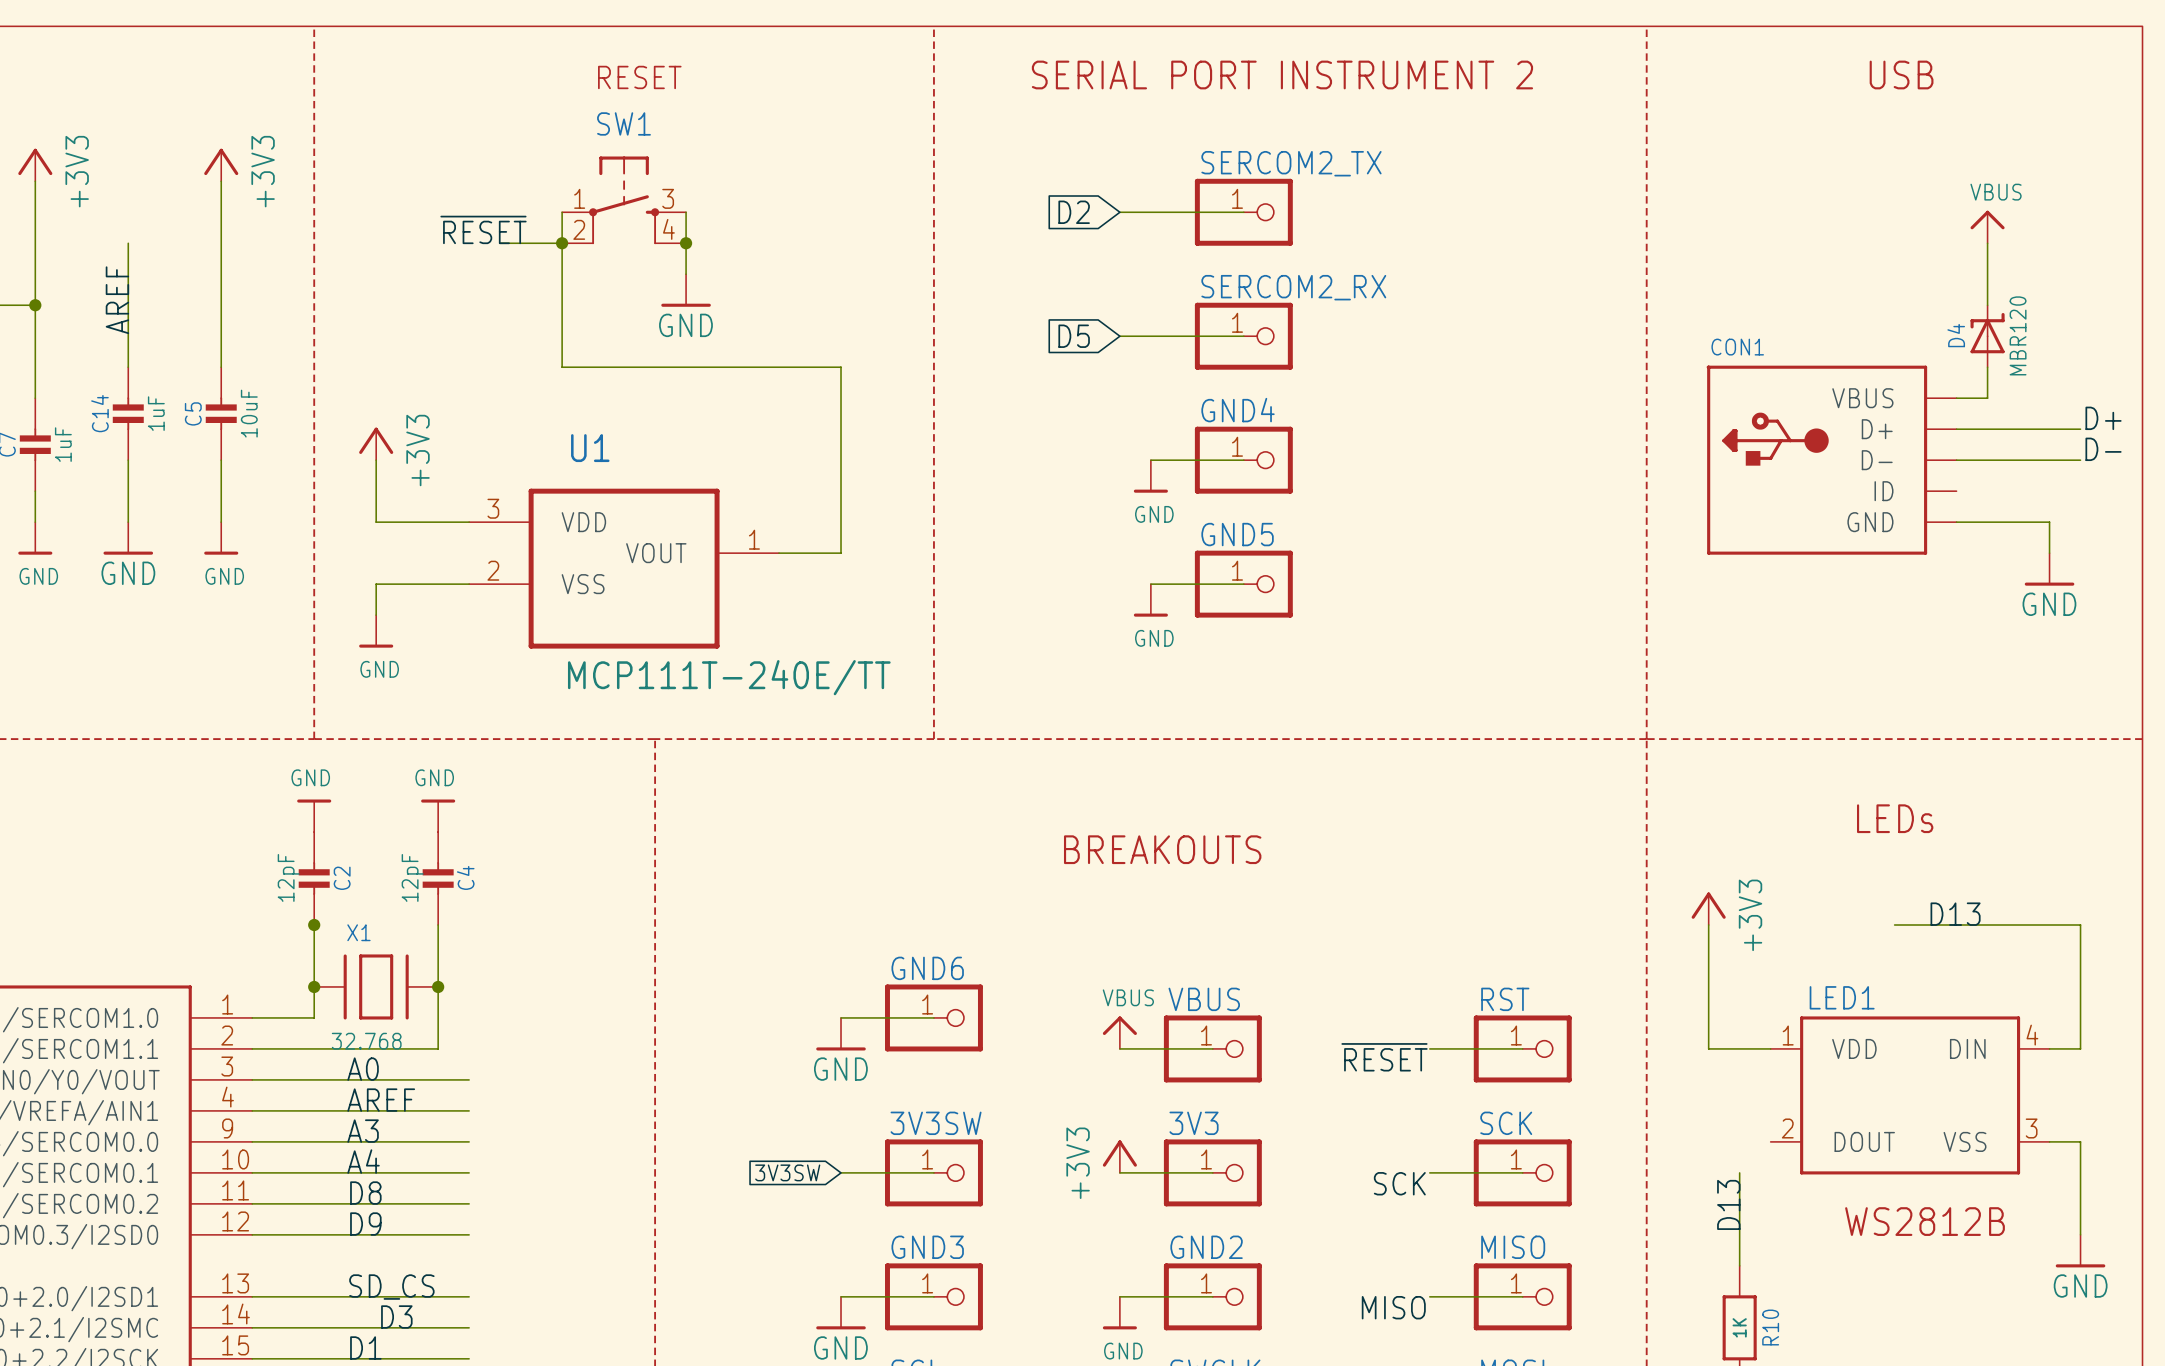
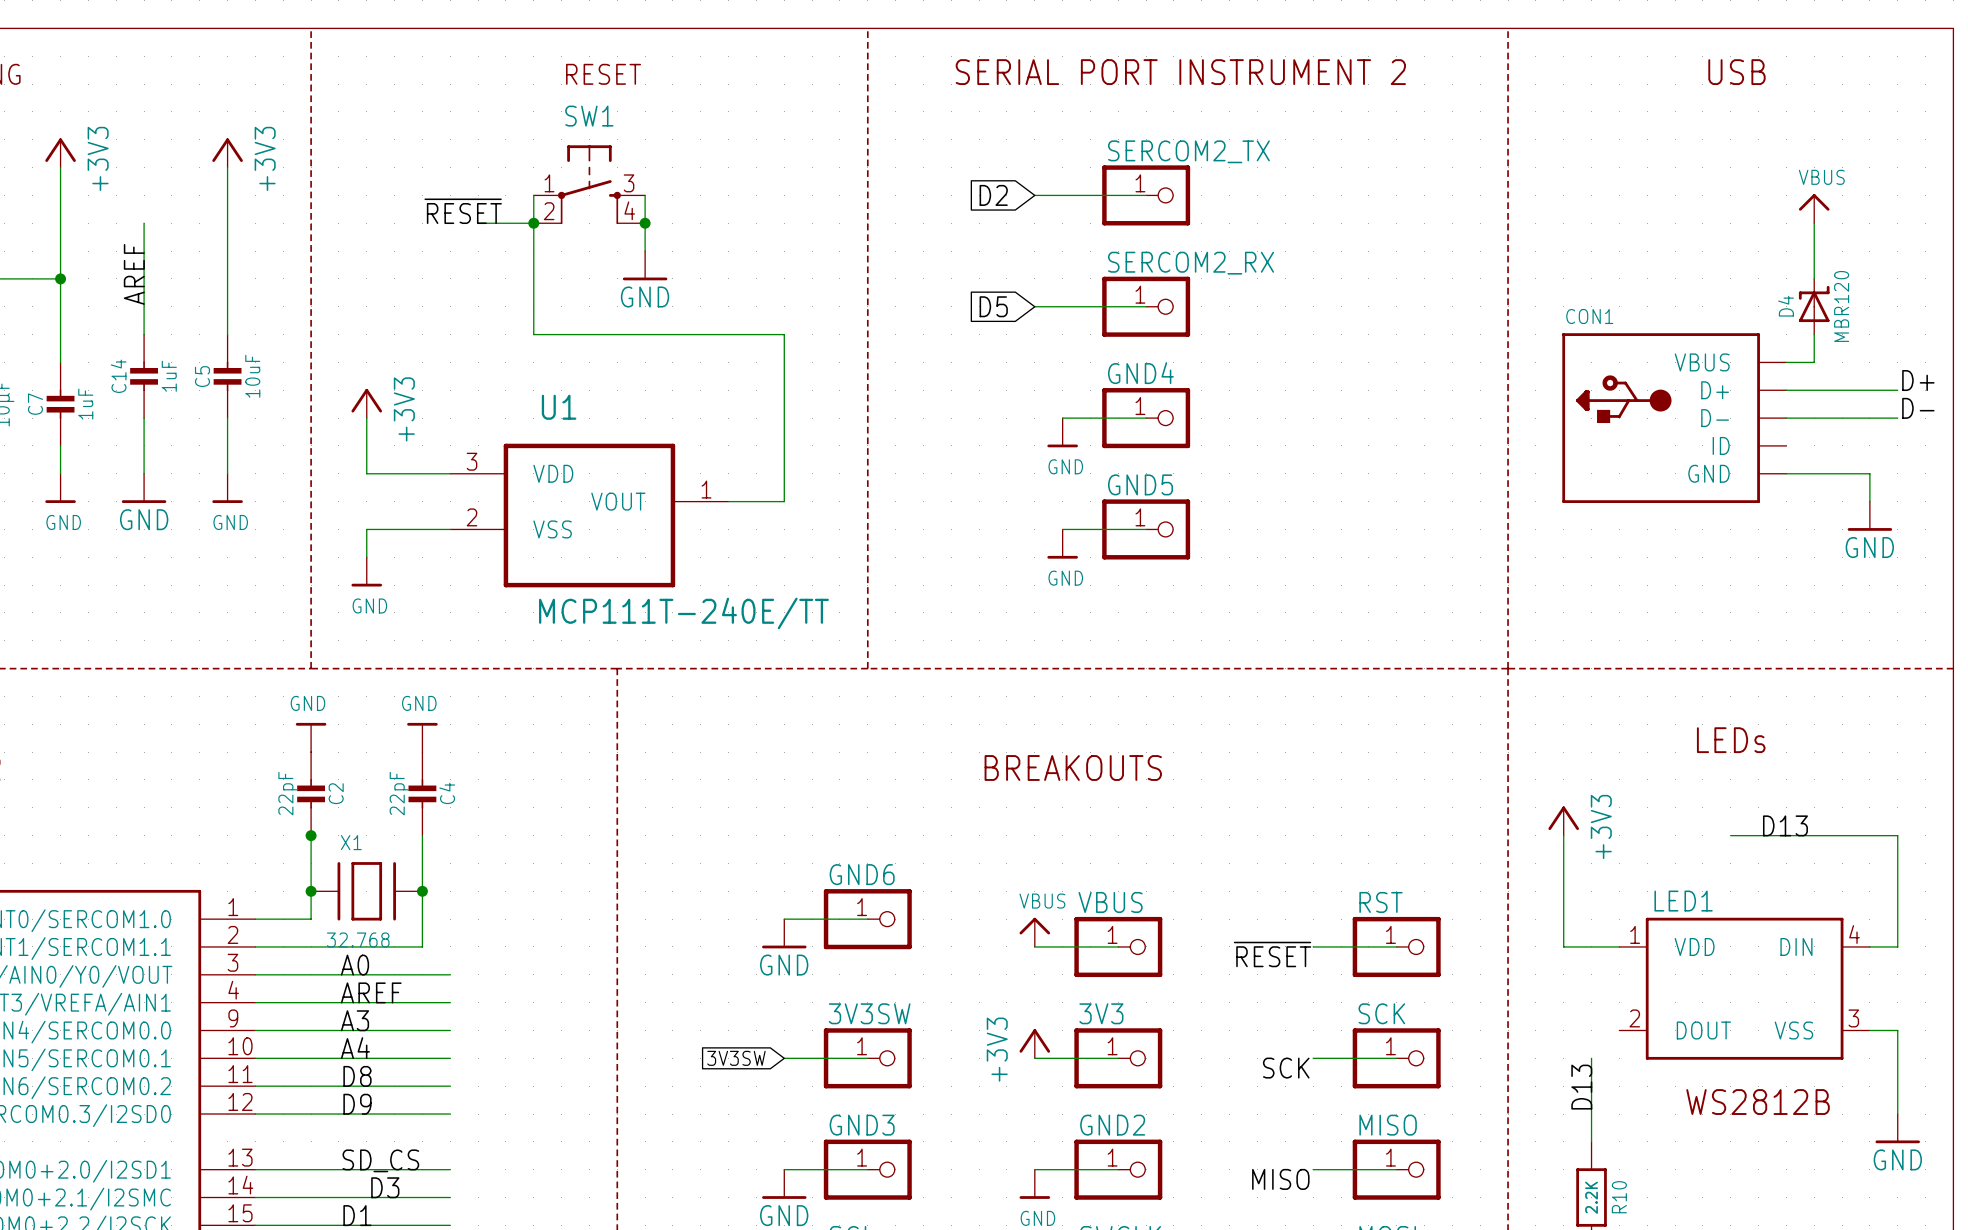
C2 value: 12pF (288, 877) -> 22pF (288, 793)
C4 value: 12pF (412, 877) -> 22pF (399, 793)
R10 value: 1K (1739, 1327) -> 2.2K (1591, 1197)

